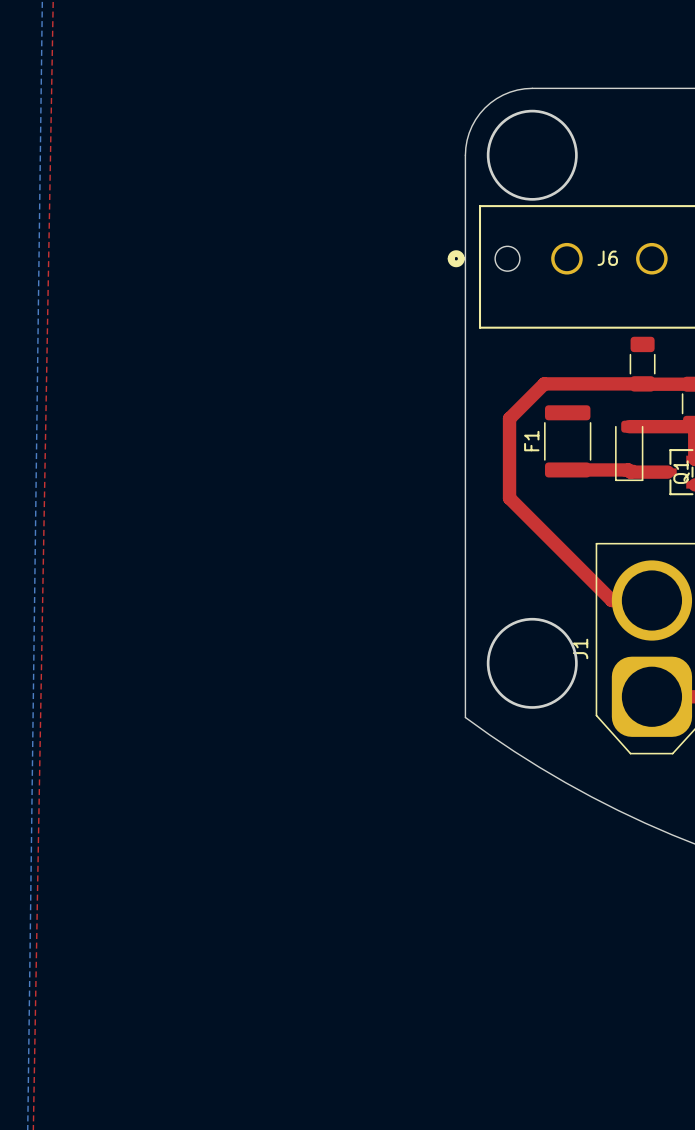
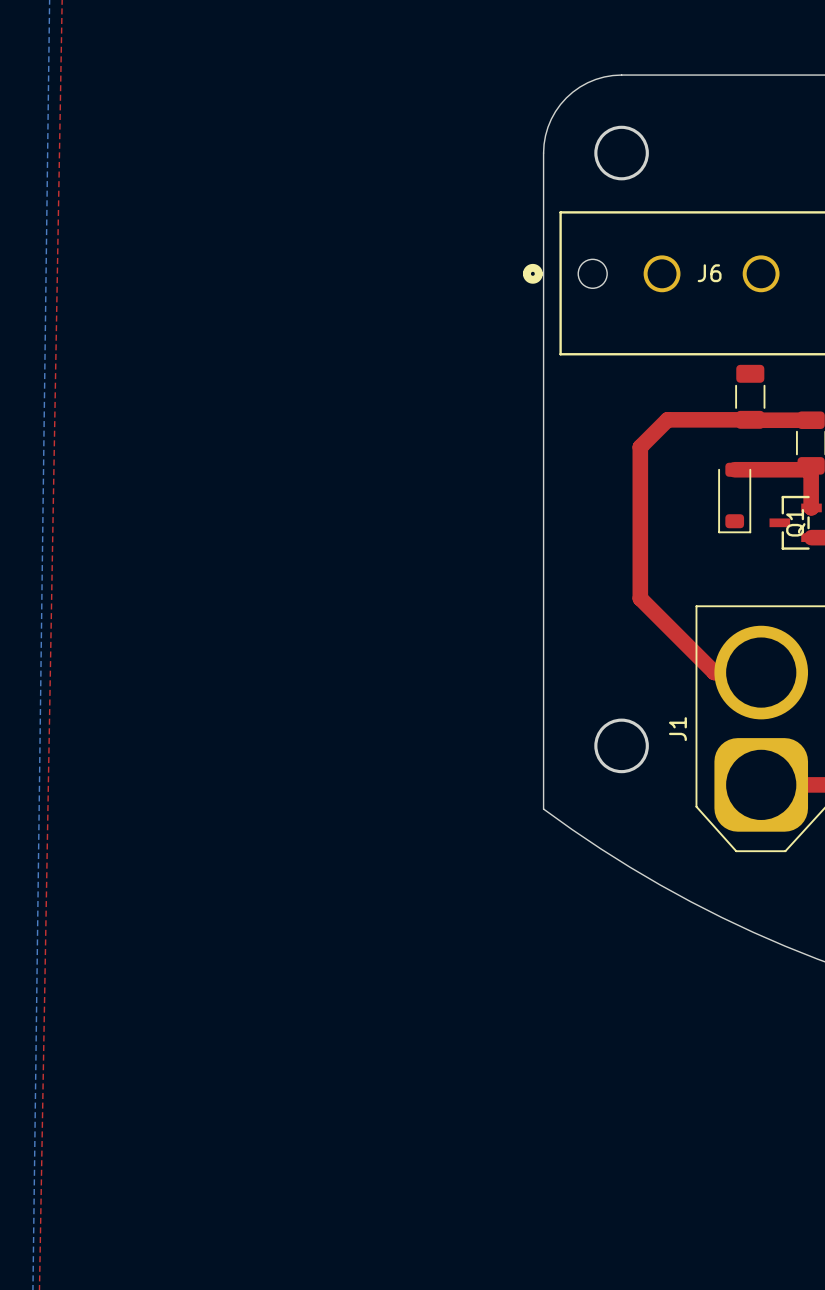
round board edge size: [486, 109, 578, 201] -> [594, 125, 649, 181]
top track: (571, 383) (544, 383) (509, 418) (509, 498) (548, 536) -> (667, 419) (640, 447) (640, 598)
F1: (567, 441) -> none
top track: (567, 469) (667, 472) -> none
round board edge size: [486, 617, 578, 709] -> [594, 718, 649, 774]

